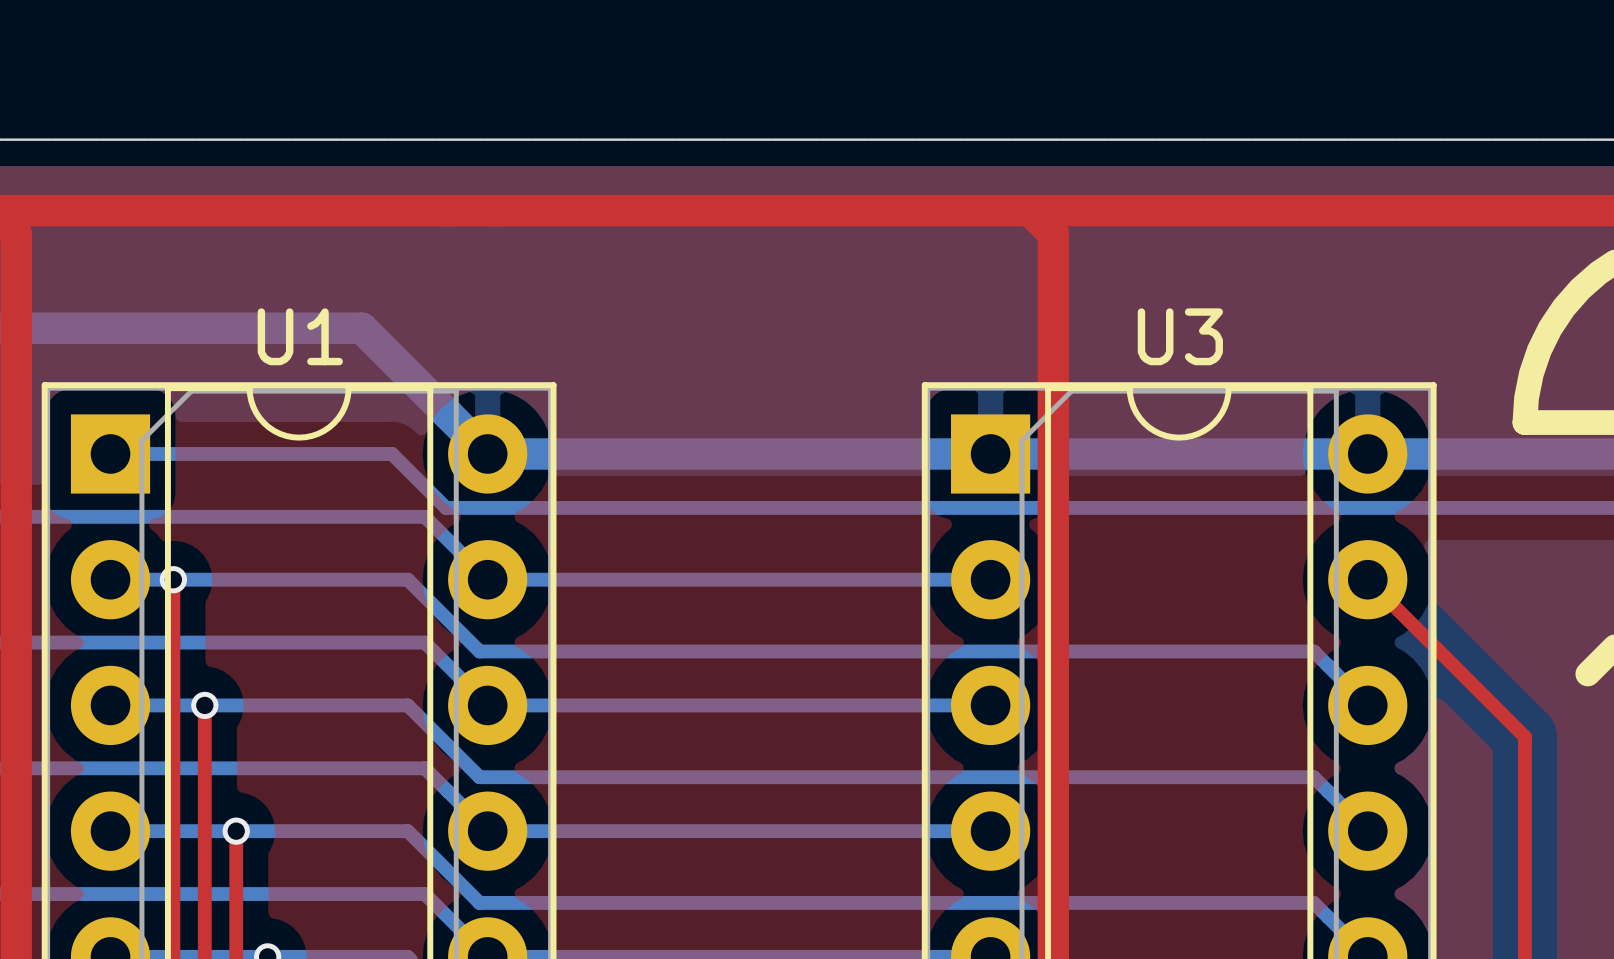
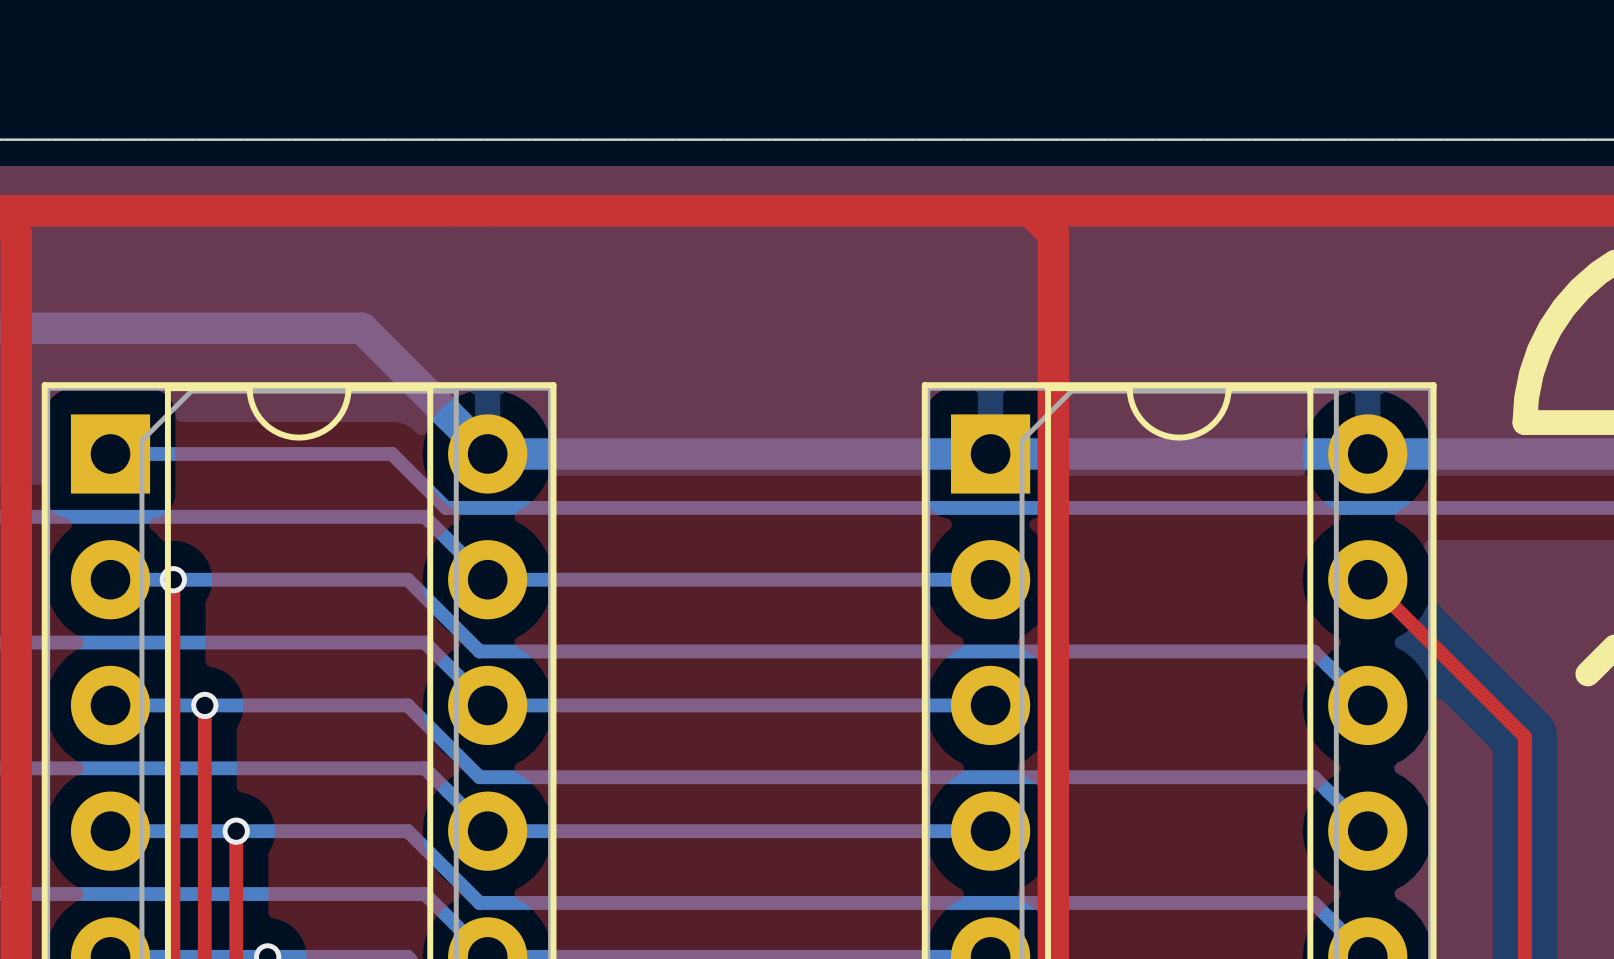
U1 name: U1 (300, 336) -> none
U3 name: U3 (1180, 336) -> none

